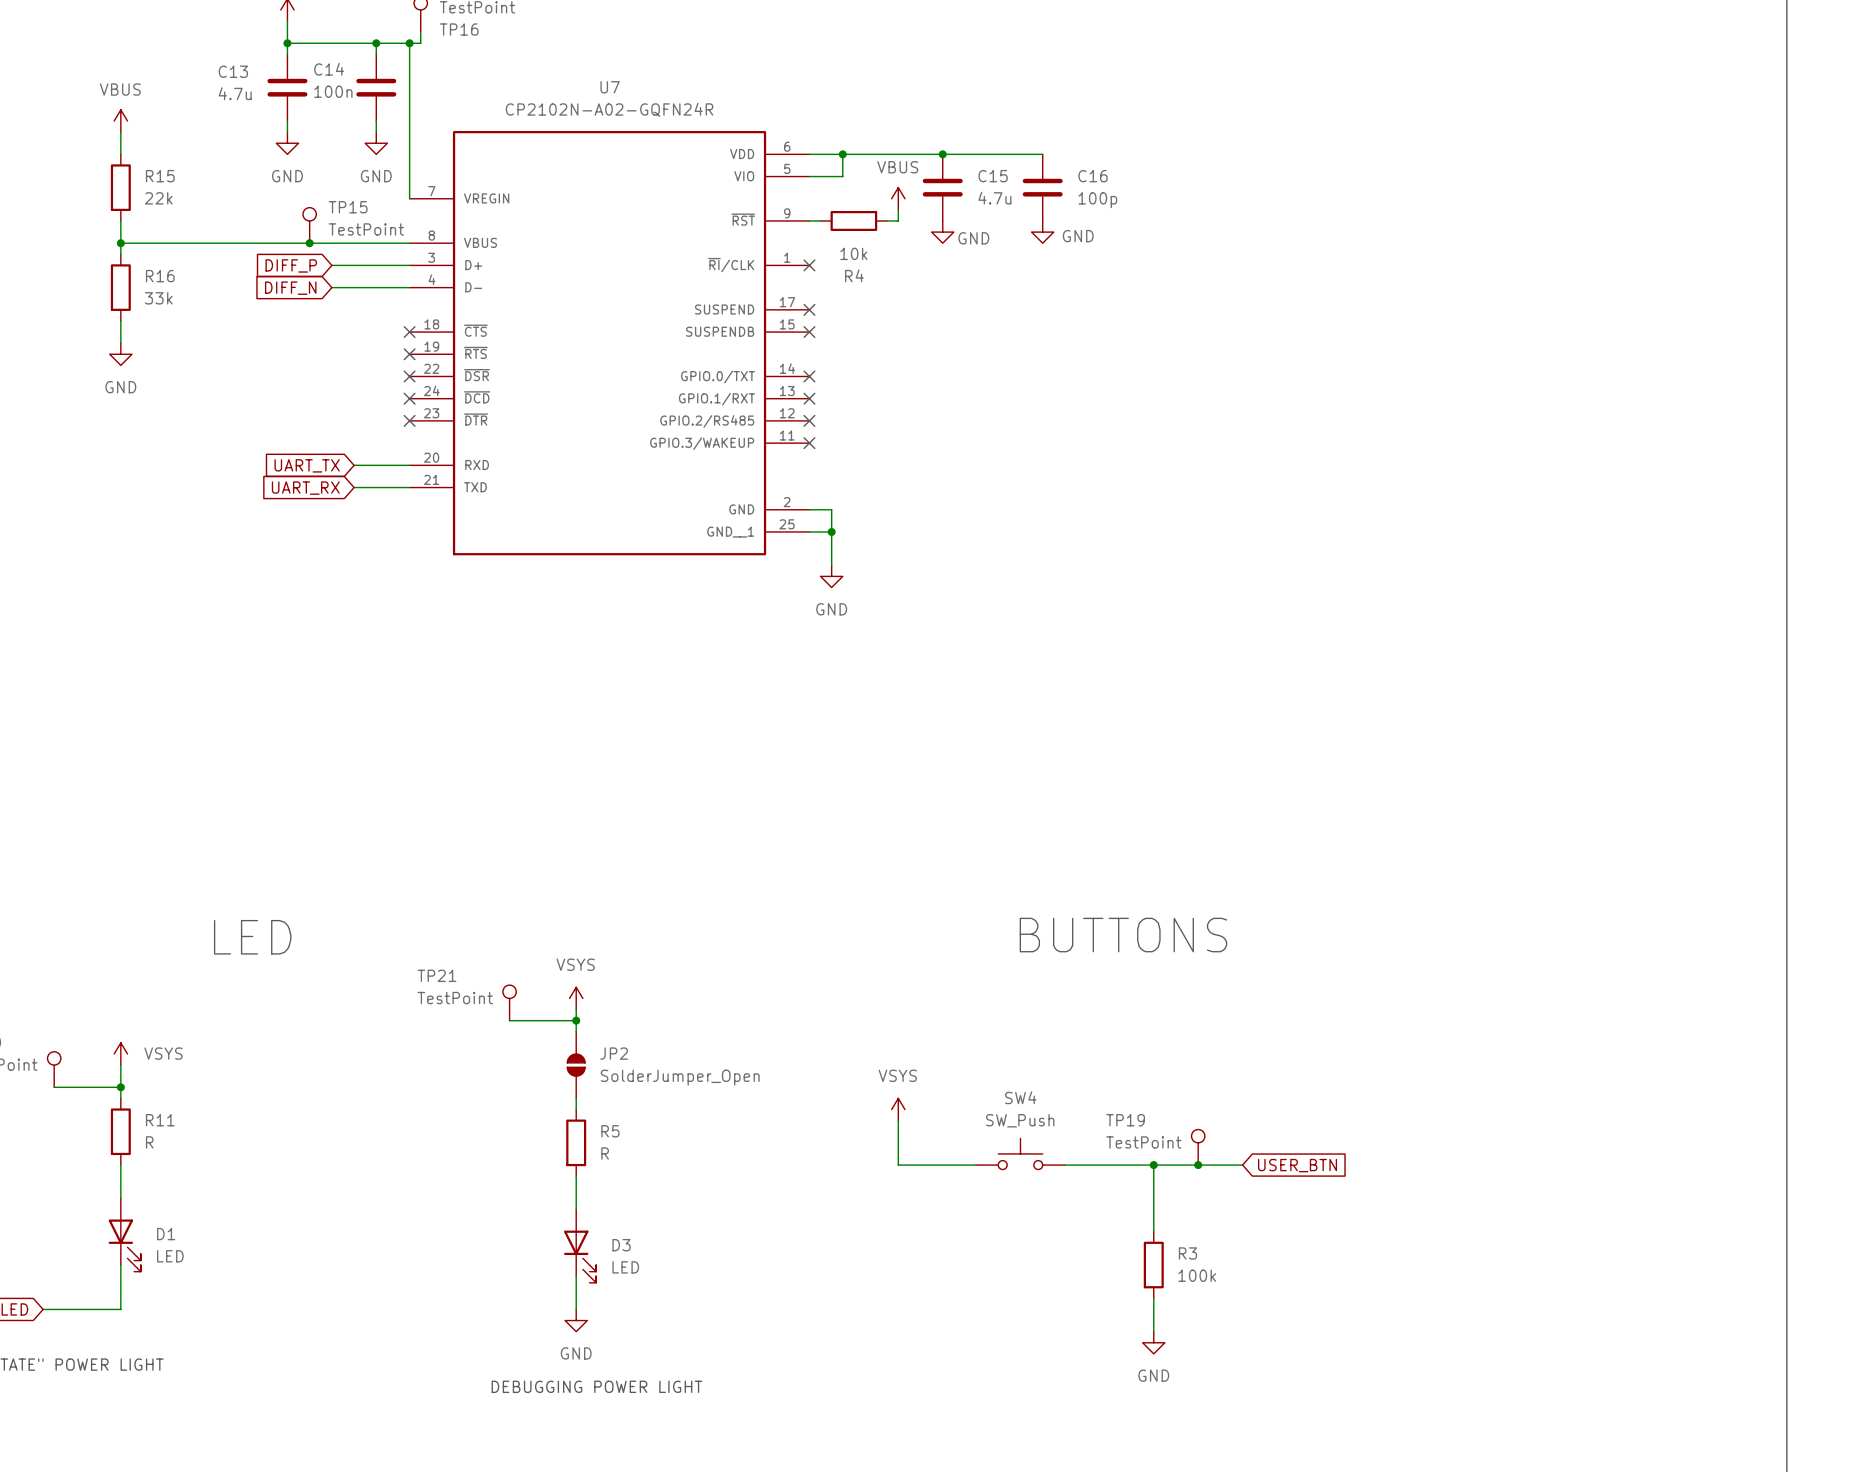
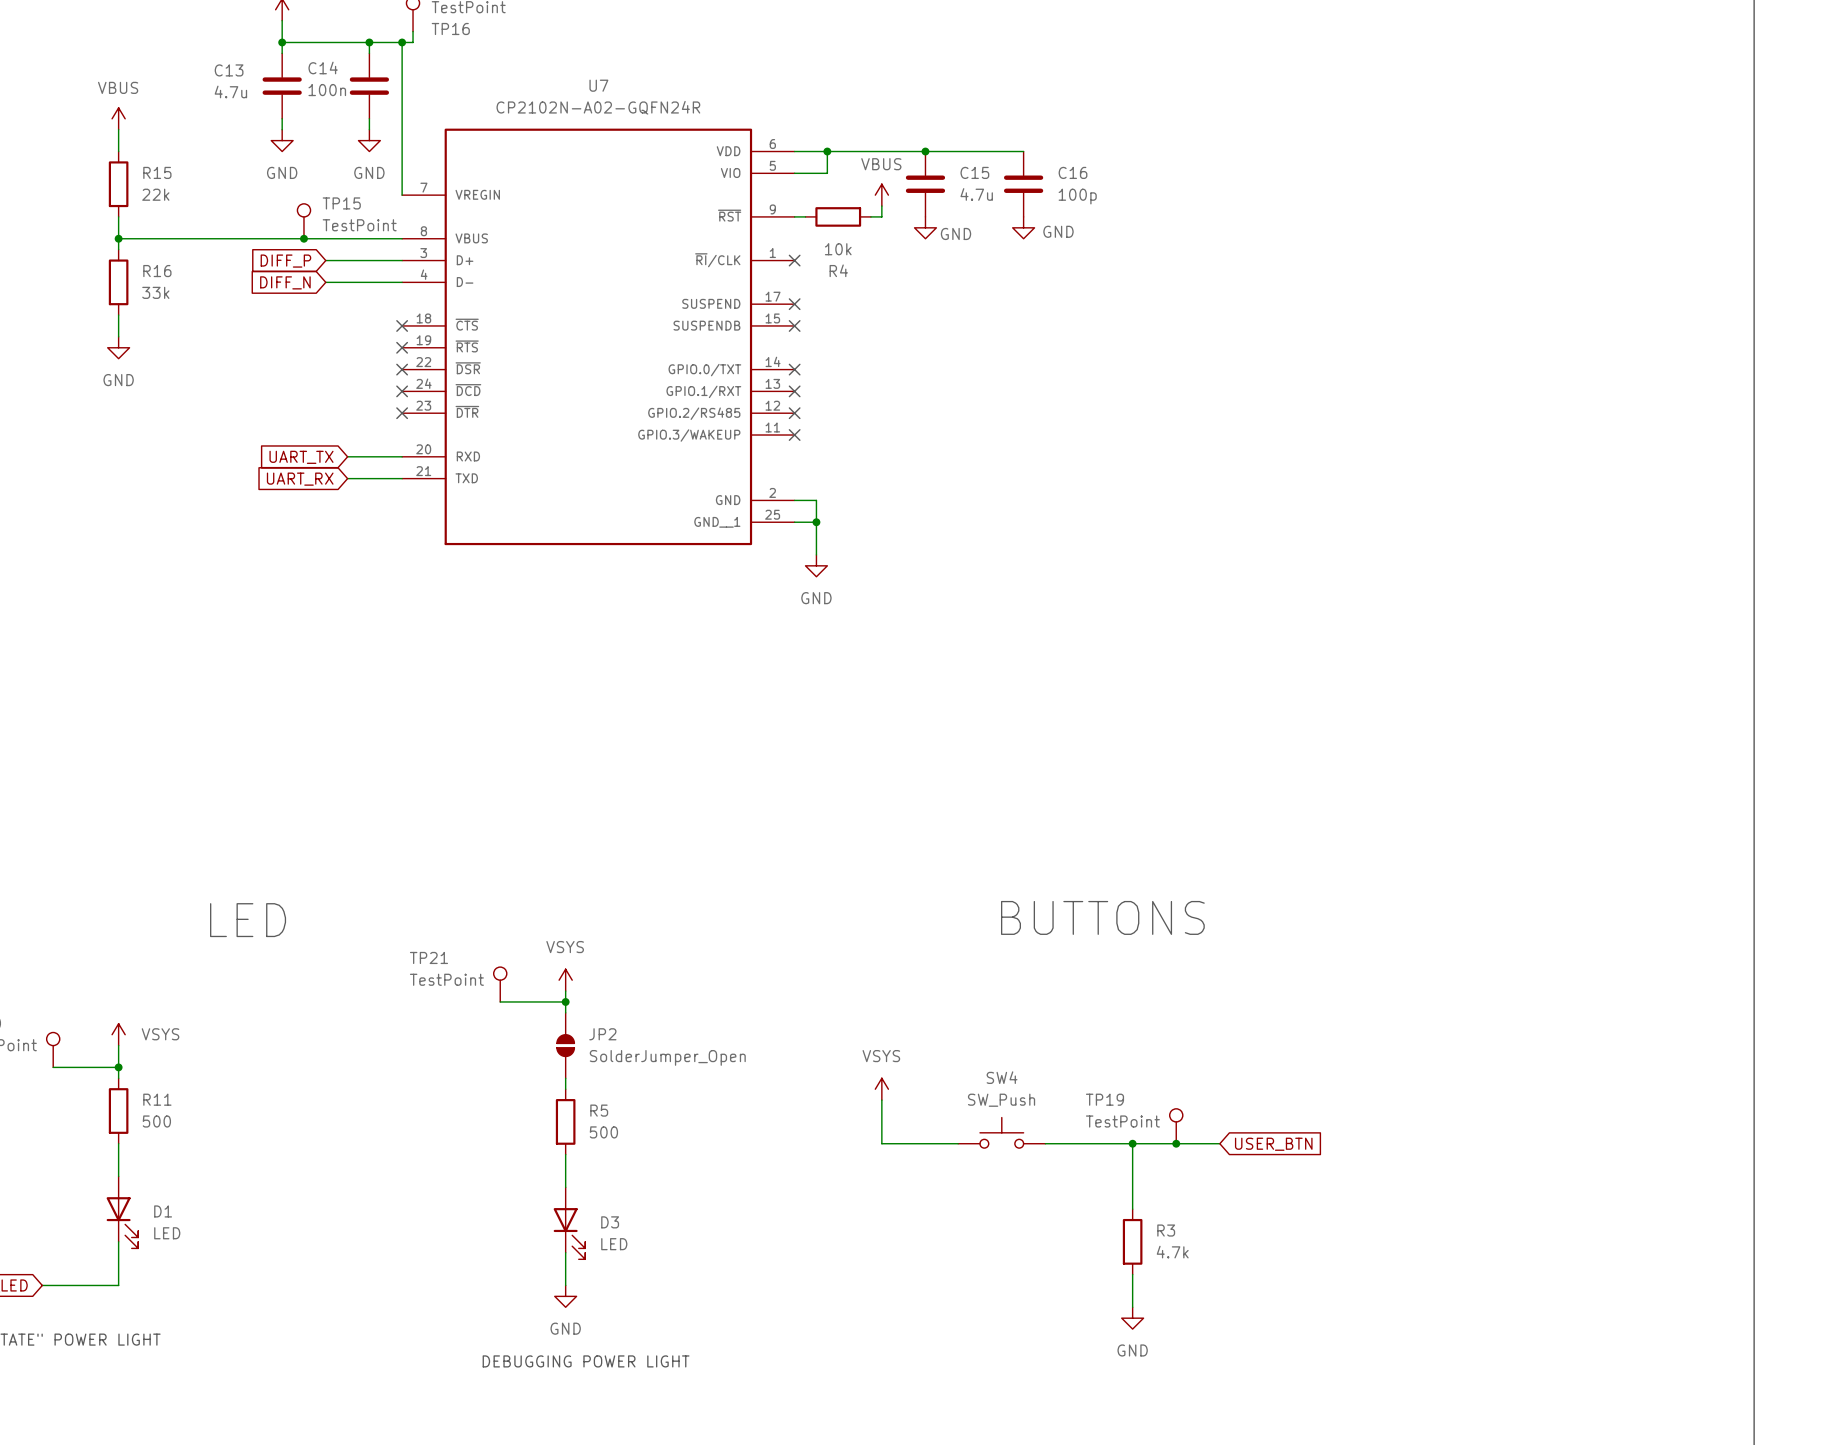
R11 value: R (149, 1142) -> 500 (156, 1121)
R5 value: R (605, 1153) -> 500 (603, 1132)
R3 value: 100k (1197, 1275) -> 4.7k (1172, 1252)

